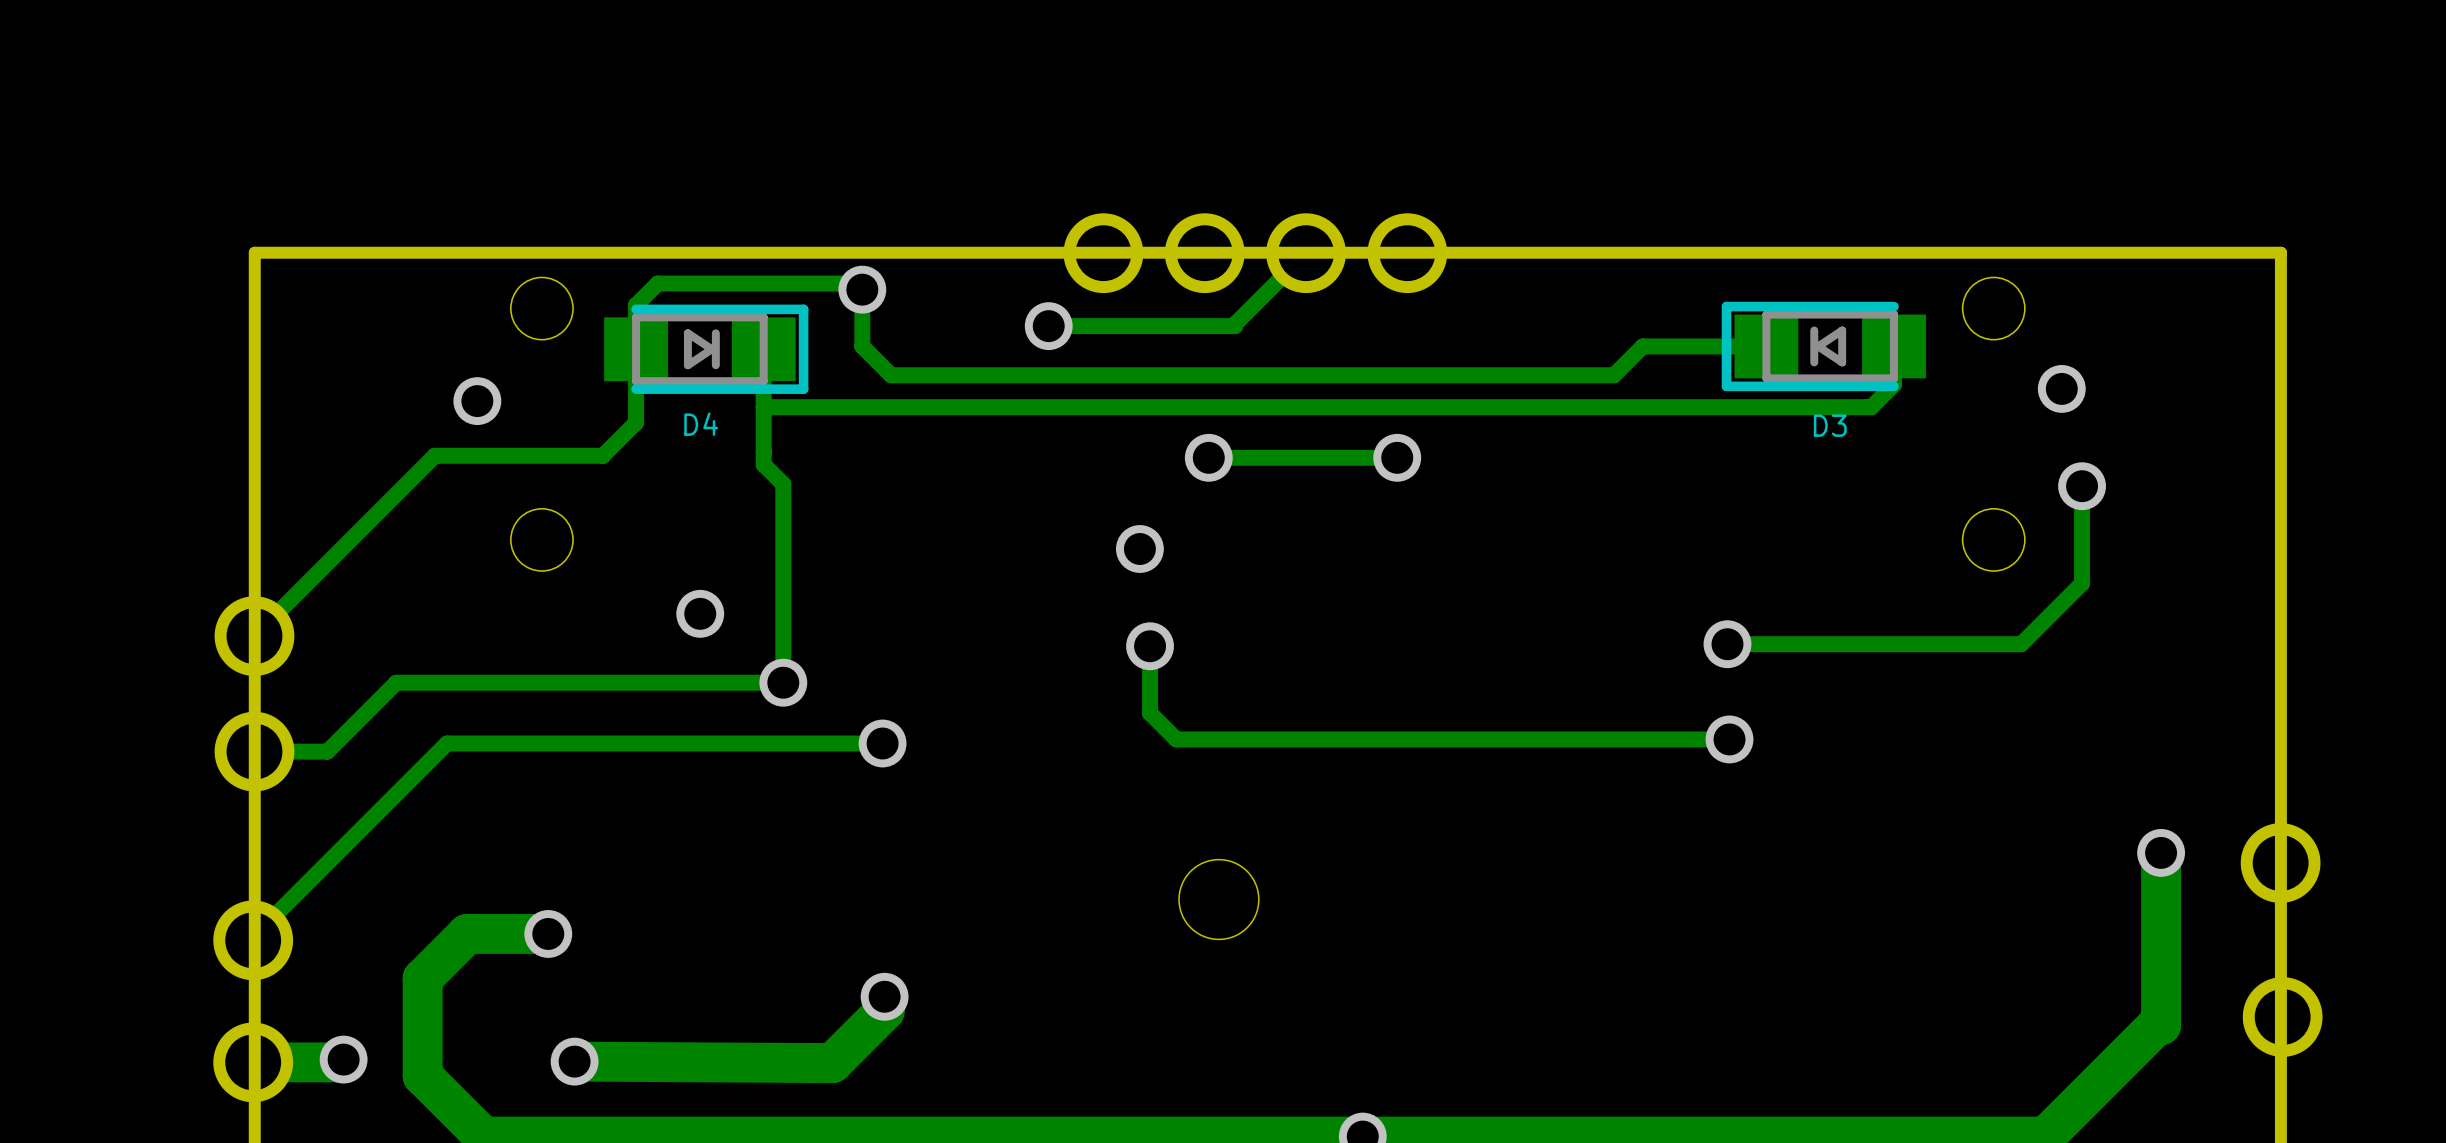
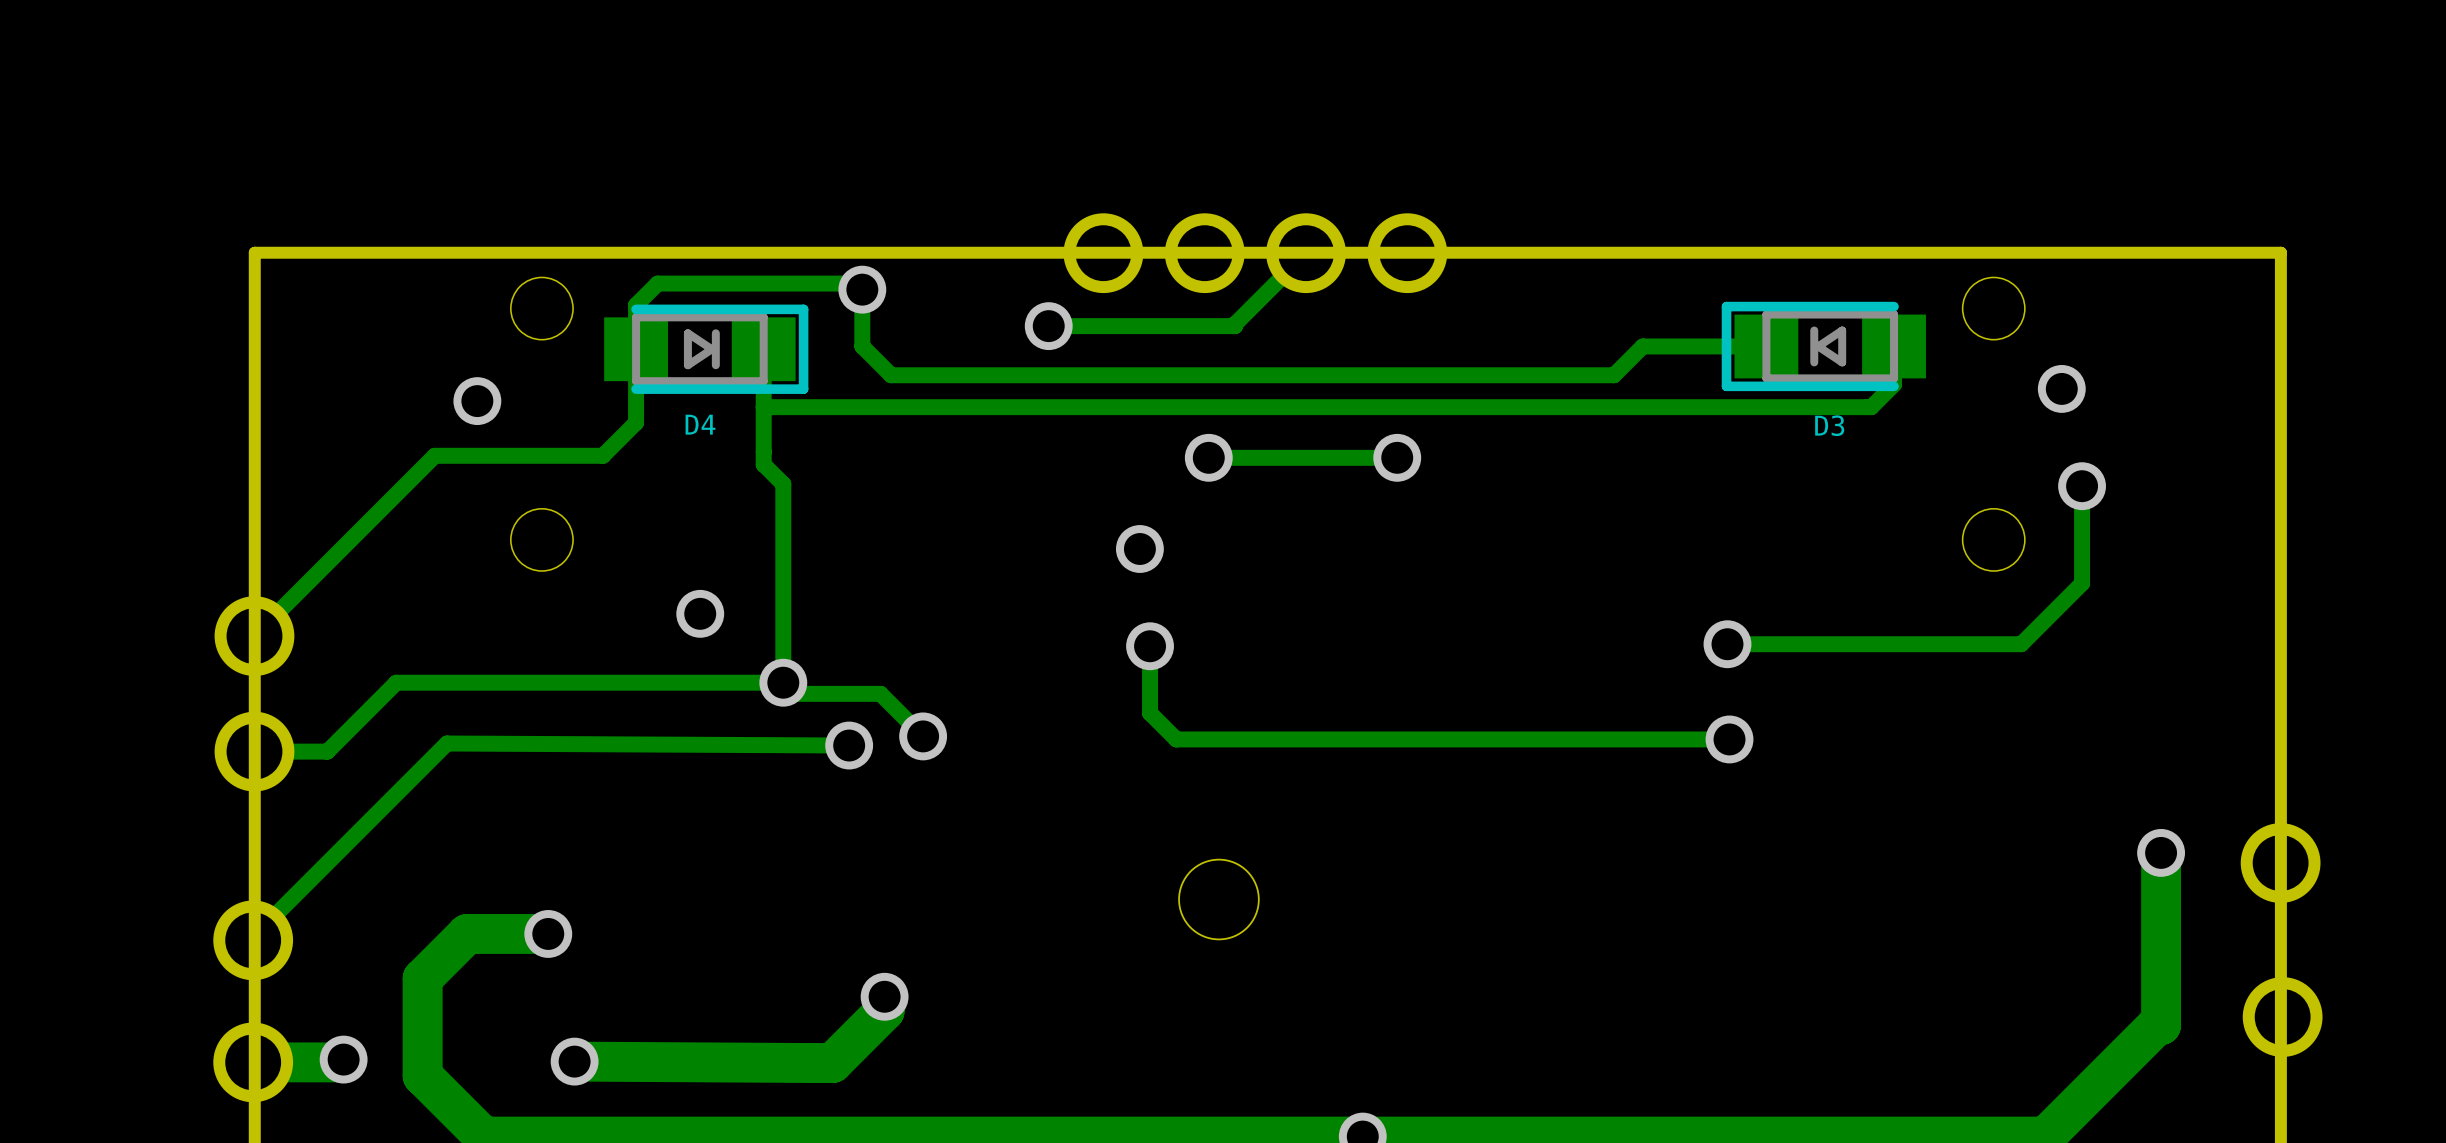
track: none -> (783, 682) (794, 693) (880, 693) (923, 736)
via: none -> (923, 736)
track: (882, 743) (446, 743) -> (849, 745) (446, 743)
via: (882, 743) -> none
via: none -> (849, 745)

